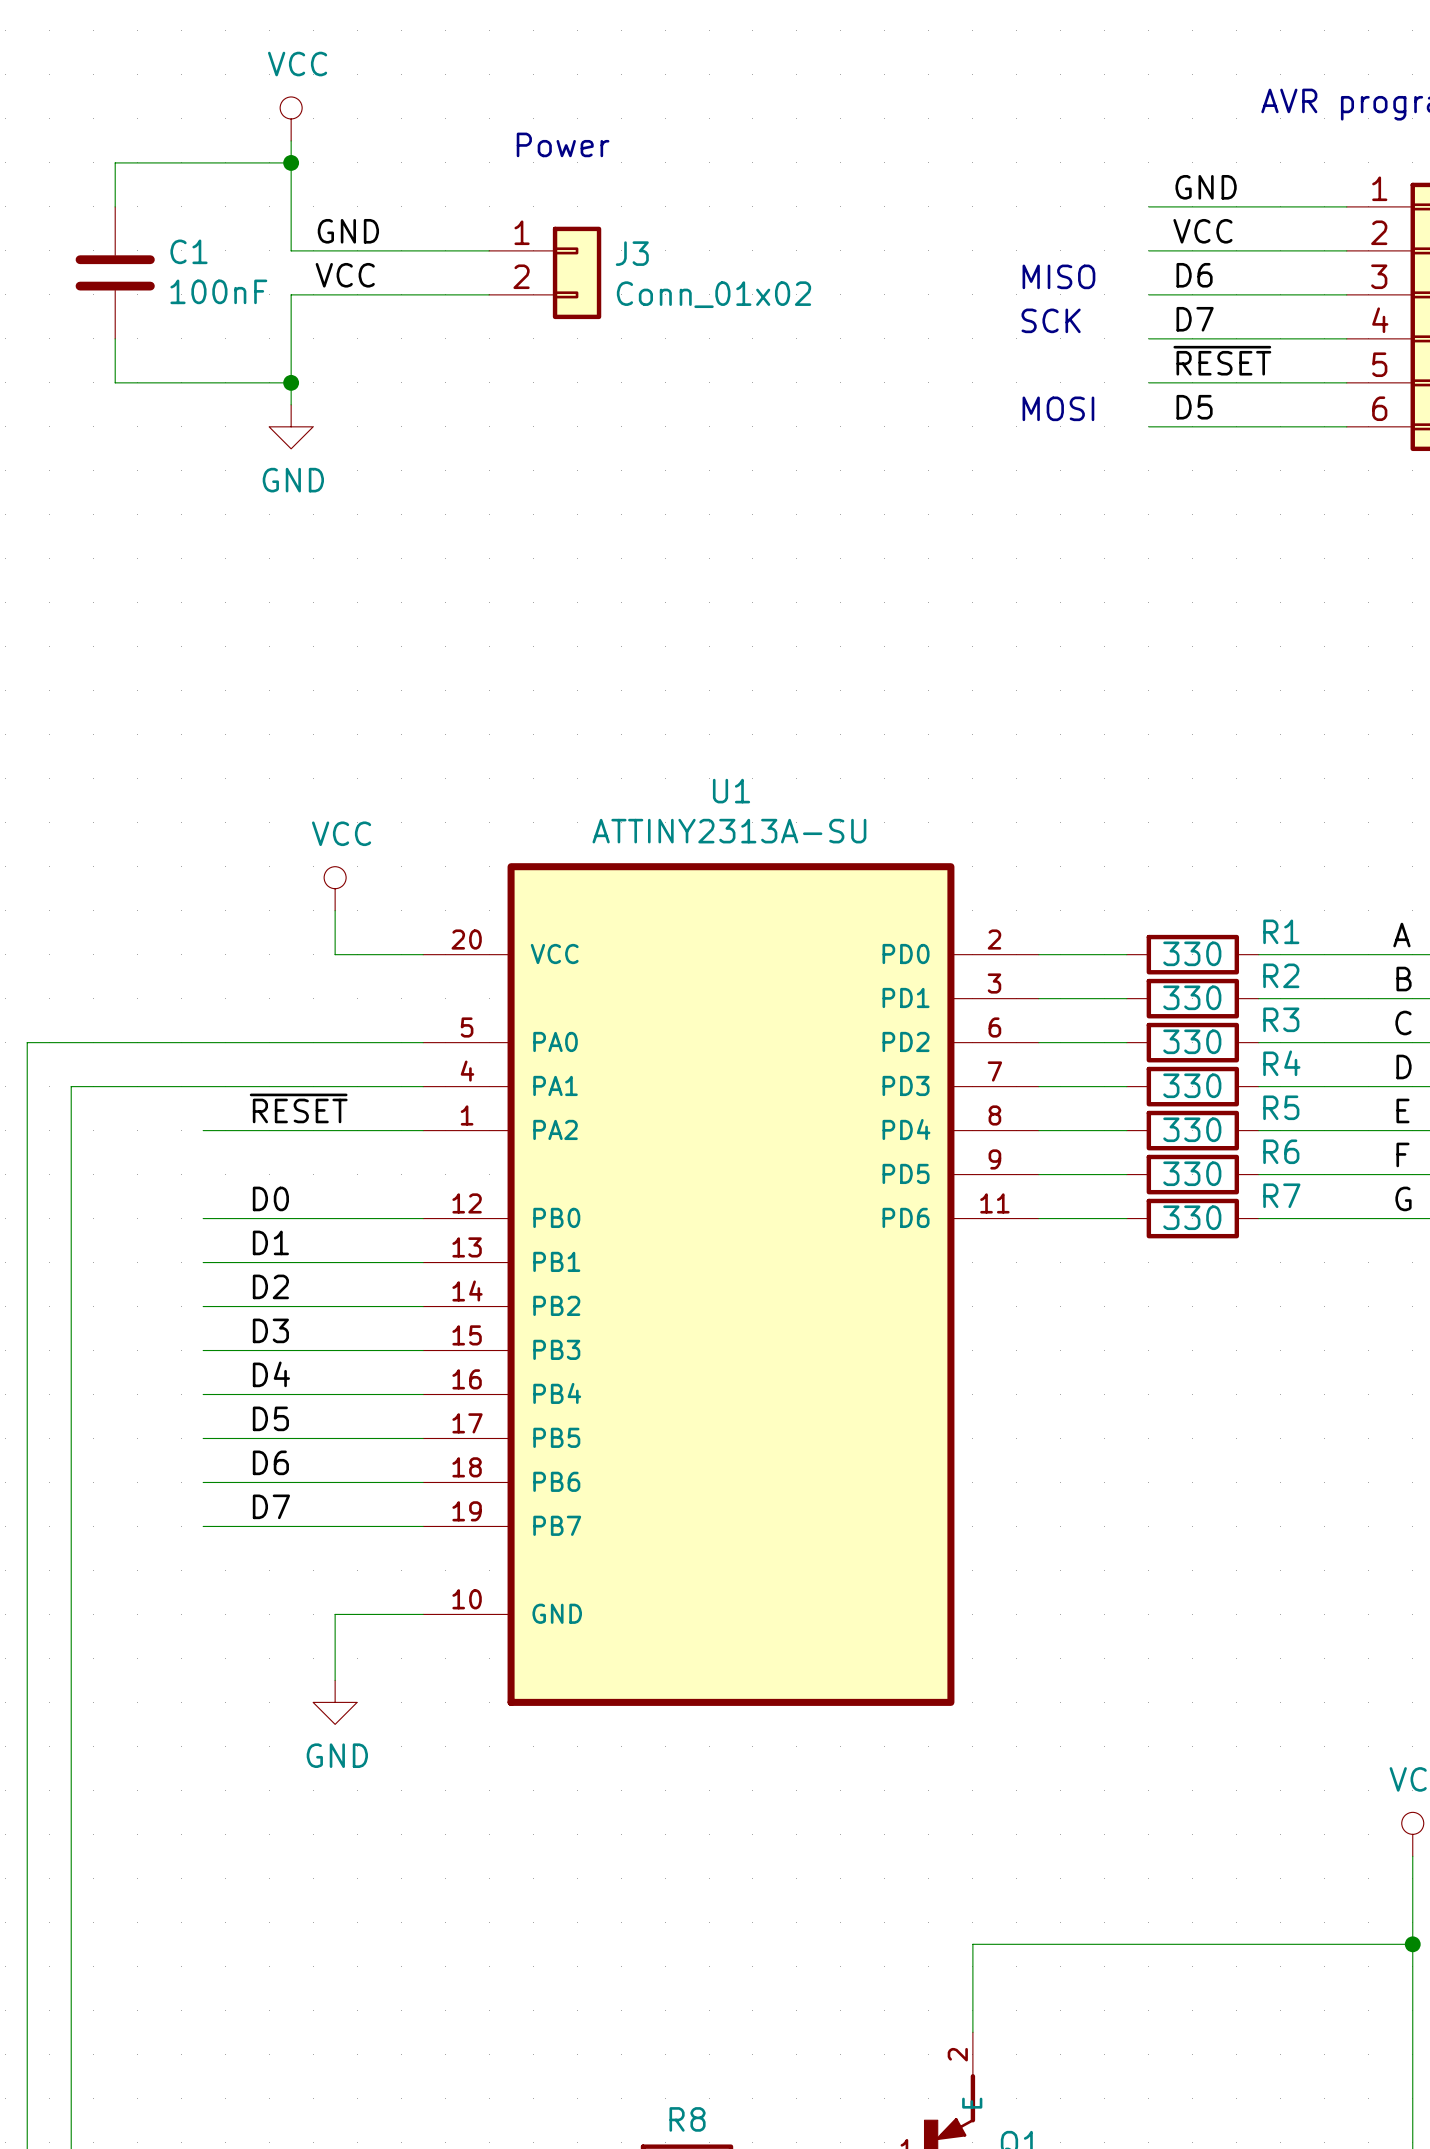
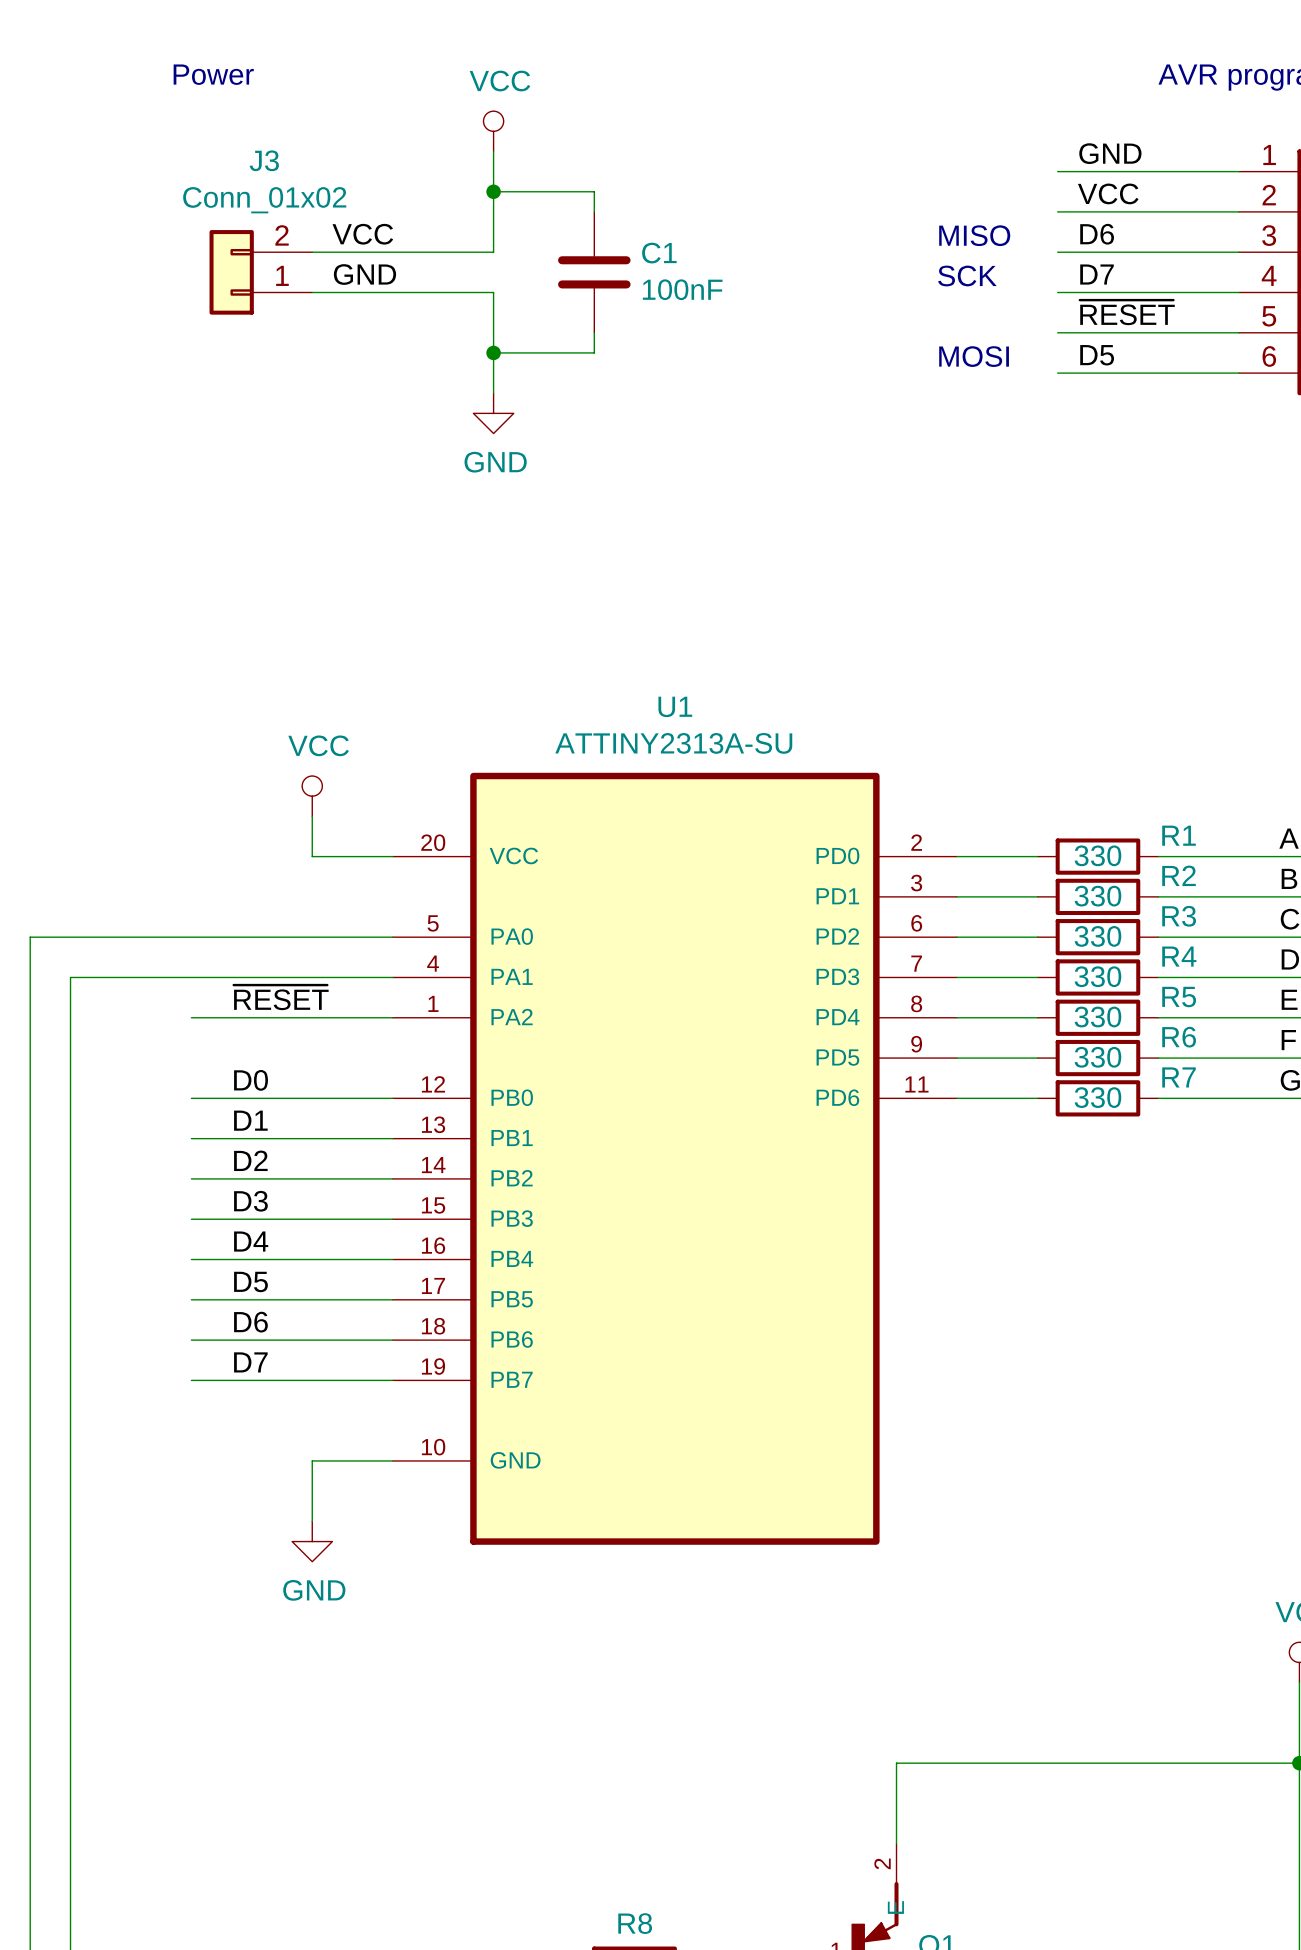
power symbol position: VCC (291, 118) -> VCC (493, 131)
wire: (291, 140) (291, 250) (489, 250) -> none
text position: Power (563, 144) -> Power (213, 74)
wire: (291, 162) (115, 162) (115, 206) -> none
junction: (291, 162) -> none
wire: none -> (493, 151) (493, 252) (453, 252)
wire: none -> (493, 191) (594, 191) (594, 211)
junction: none -> (493, 191)
label position: GND (348, 231) -> GND (364, 274)
J3 name position: J3 (632, 253) -> J3 (264, 160)
C1 position: (115, 272) -> (594, 272)
J3 position: (545, 272) -> (260, 272)
J3 rotation: 0° (577, 272) -> 180° (231, 272)
label position: VCC (345, 275) -> VCC (362, 234)
wire: (335, 294) (291, 294) (291, 404) -> none
J3 value position: Conn_01x02 (713, 294) -> Conn_01x02 (264, 200)
wire: (115, 338) (115, 382) (291, 382) -> none
wire: none -> (312, 292) (493, 292) (493, 393)
junction: (291, 382) -> none
wire: none -> (594, 332) (594, 352) (493, 352)
junction: none -> (493, 352)
power symbol position: GND (291, 426) -> GND (493, 413)

